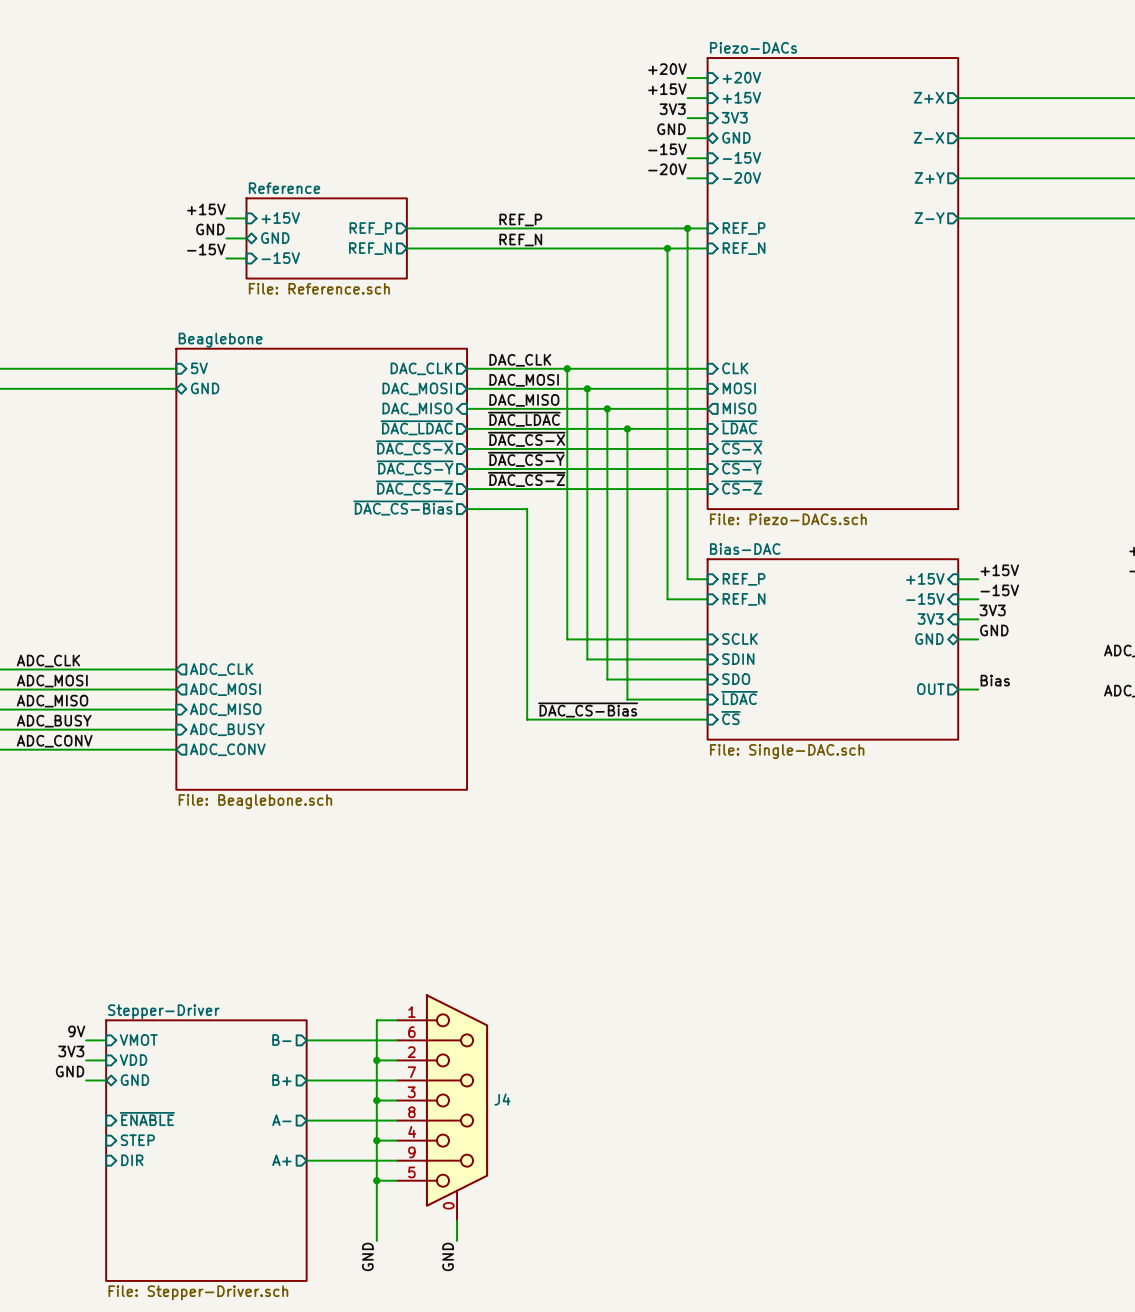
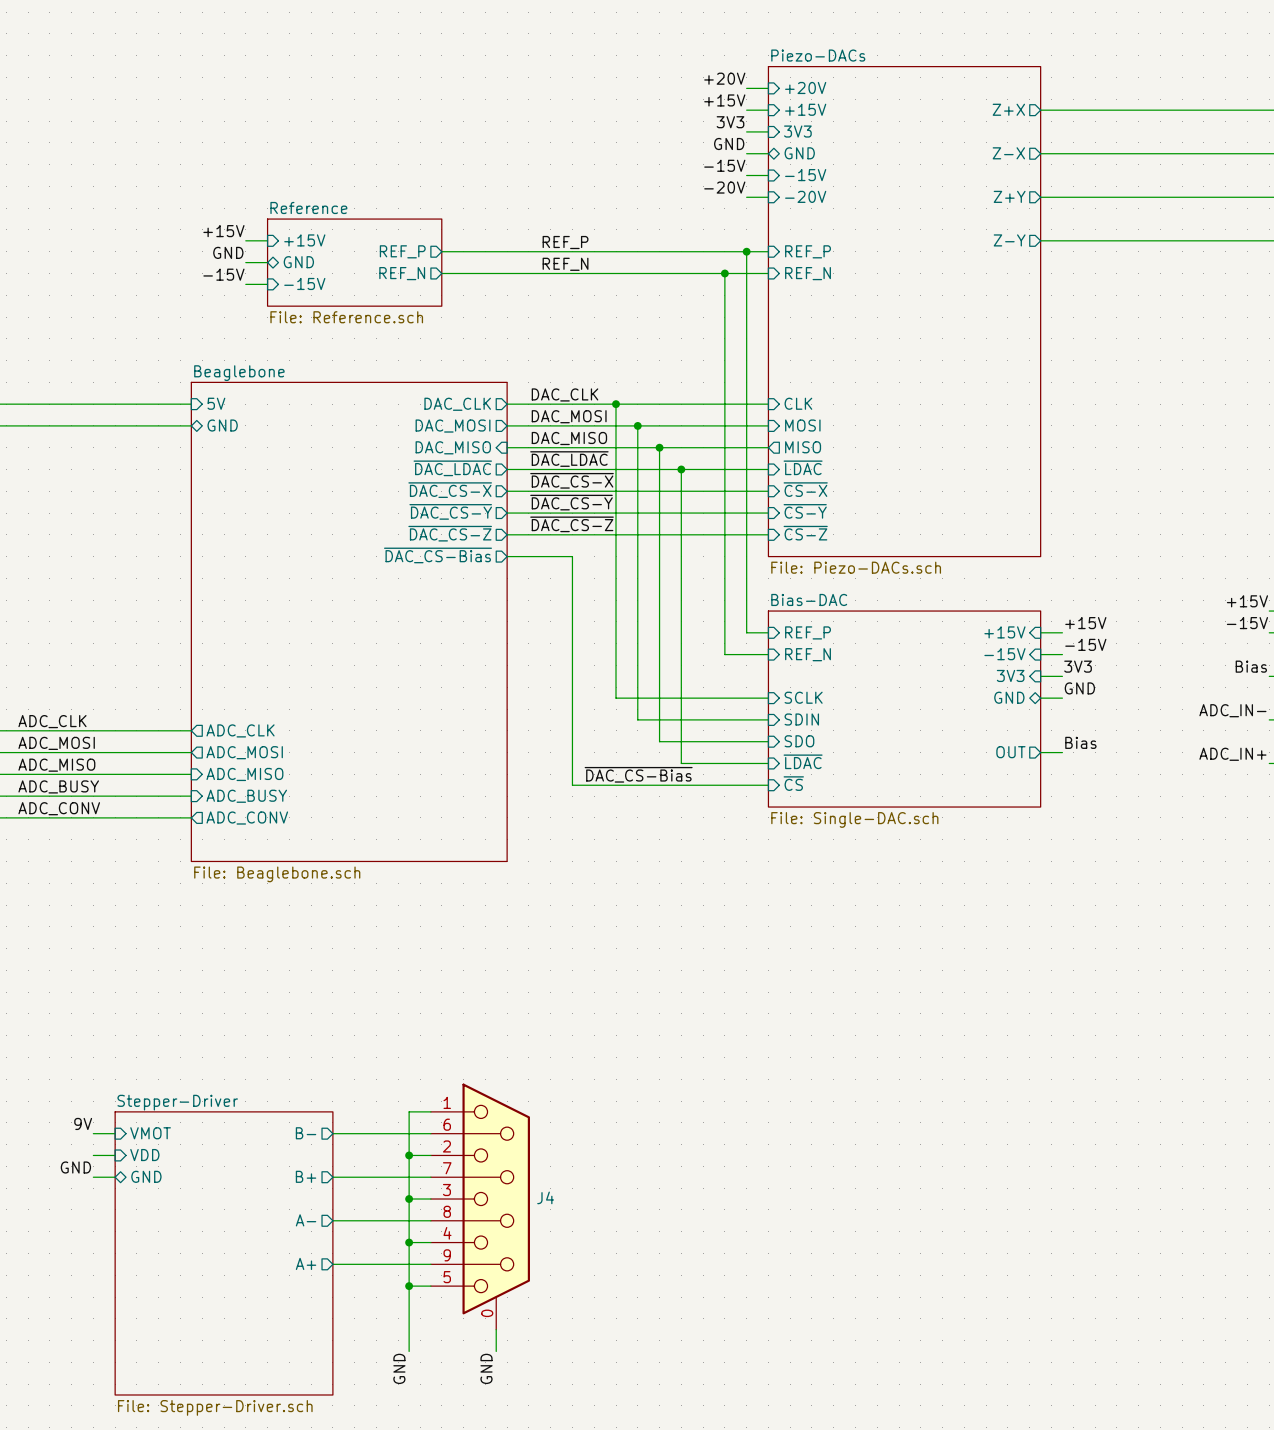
label: 3V3 (71, 1051) -> none
sheet pin: ~{ENABLE} (147, 1119) -> none
sheet pin: STEP (137, 1140) -> none
sheet pin: DIR (132, 1160) -> none

